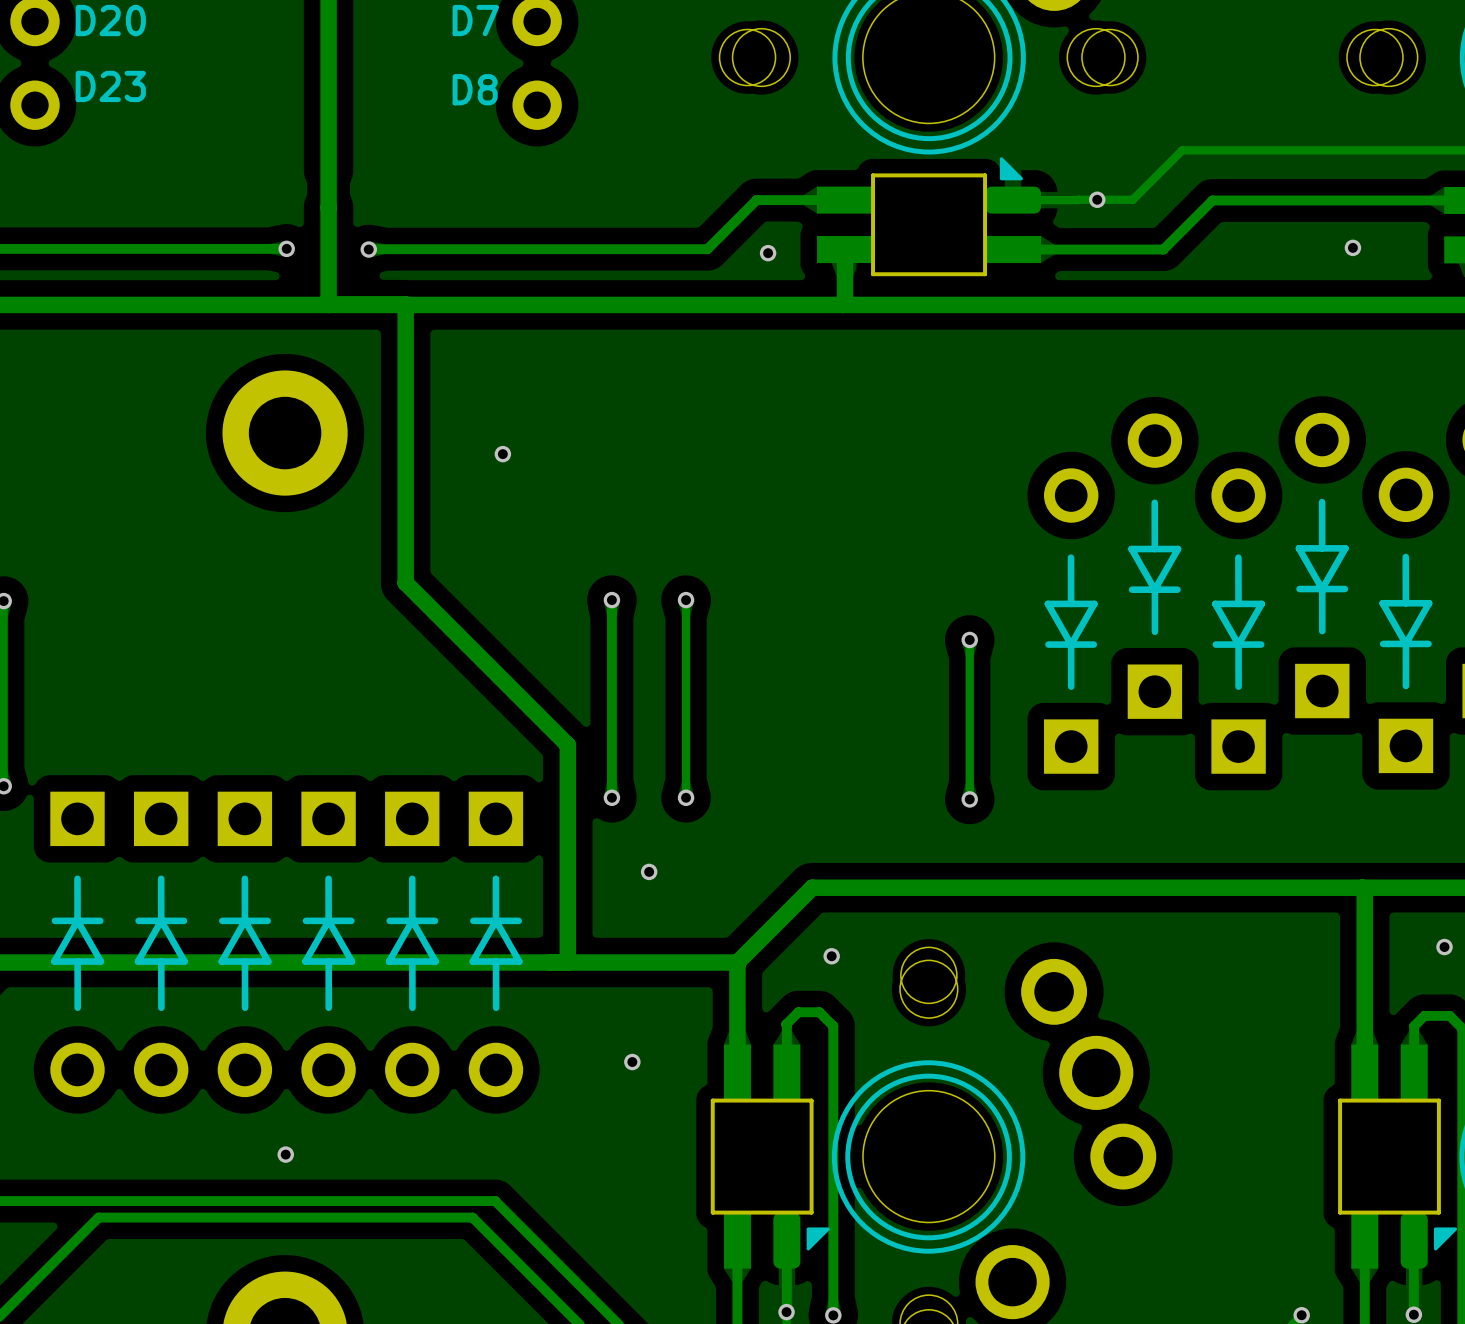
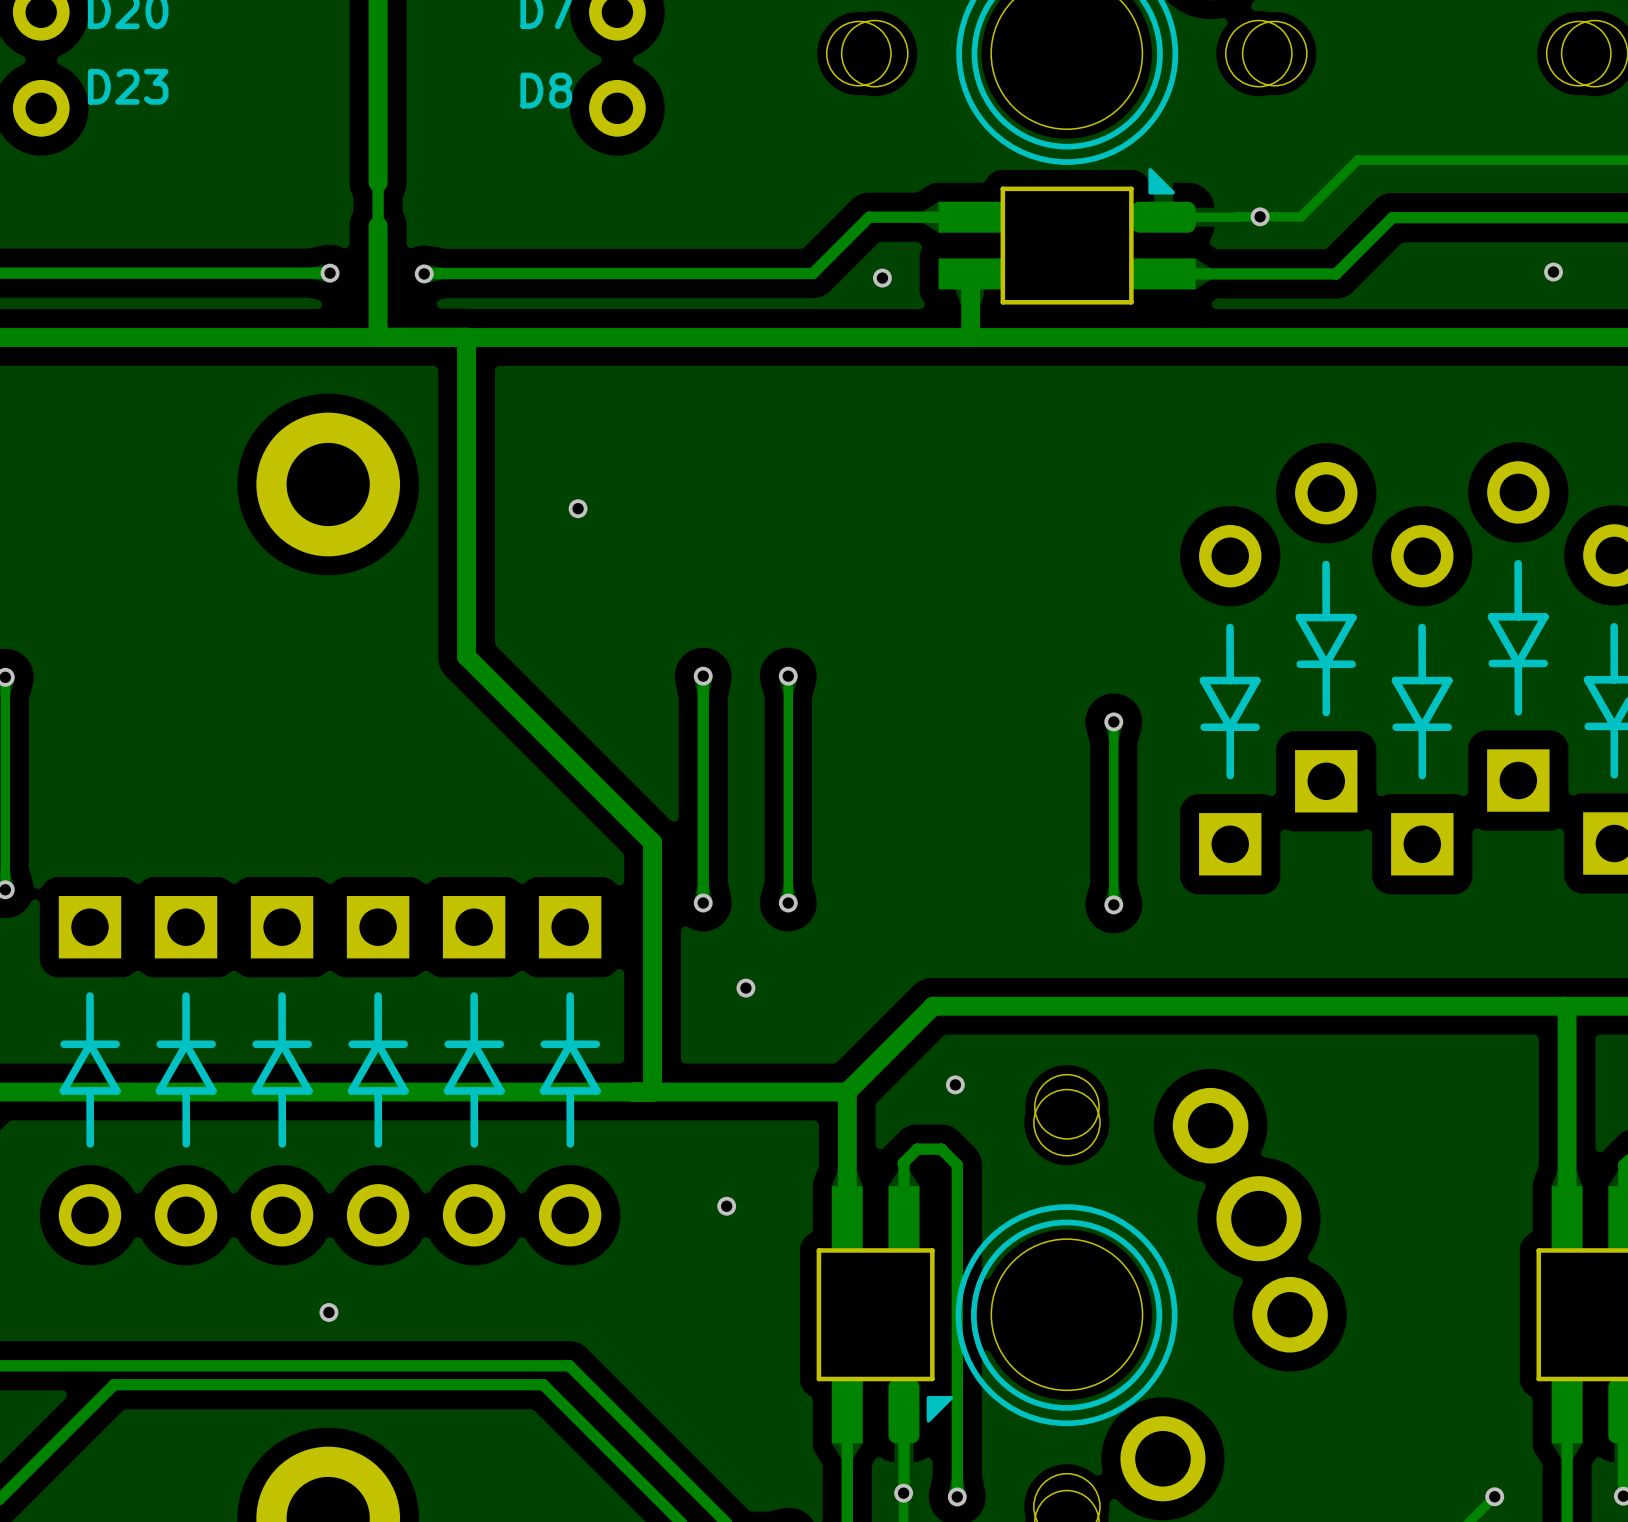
track width: thick (328, 170) (328, 207) -> thin (378, 182) (378, 225)

